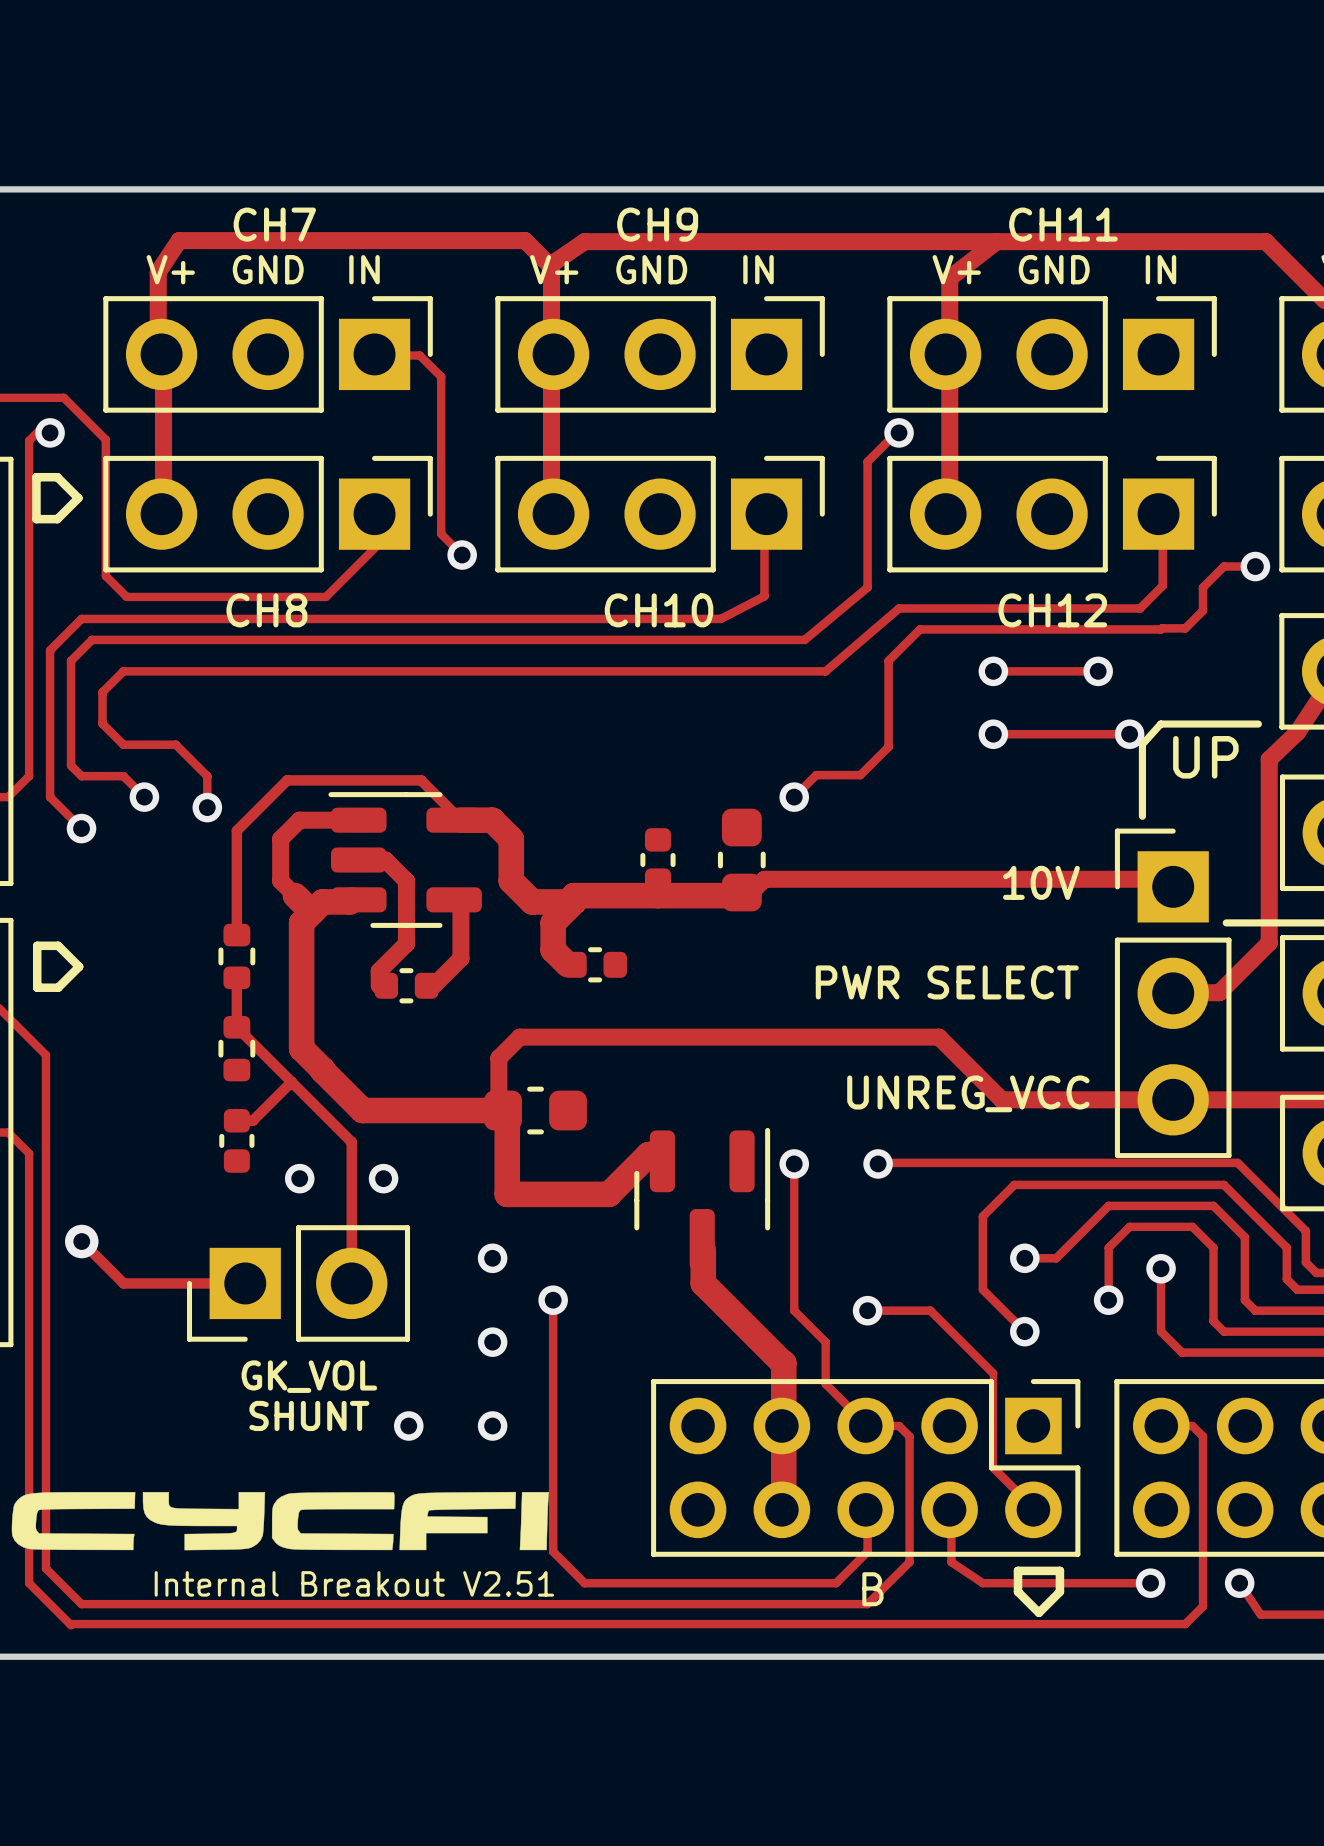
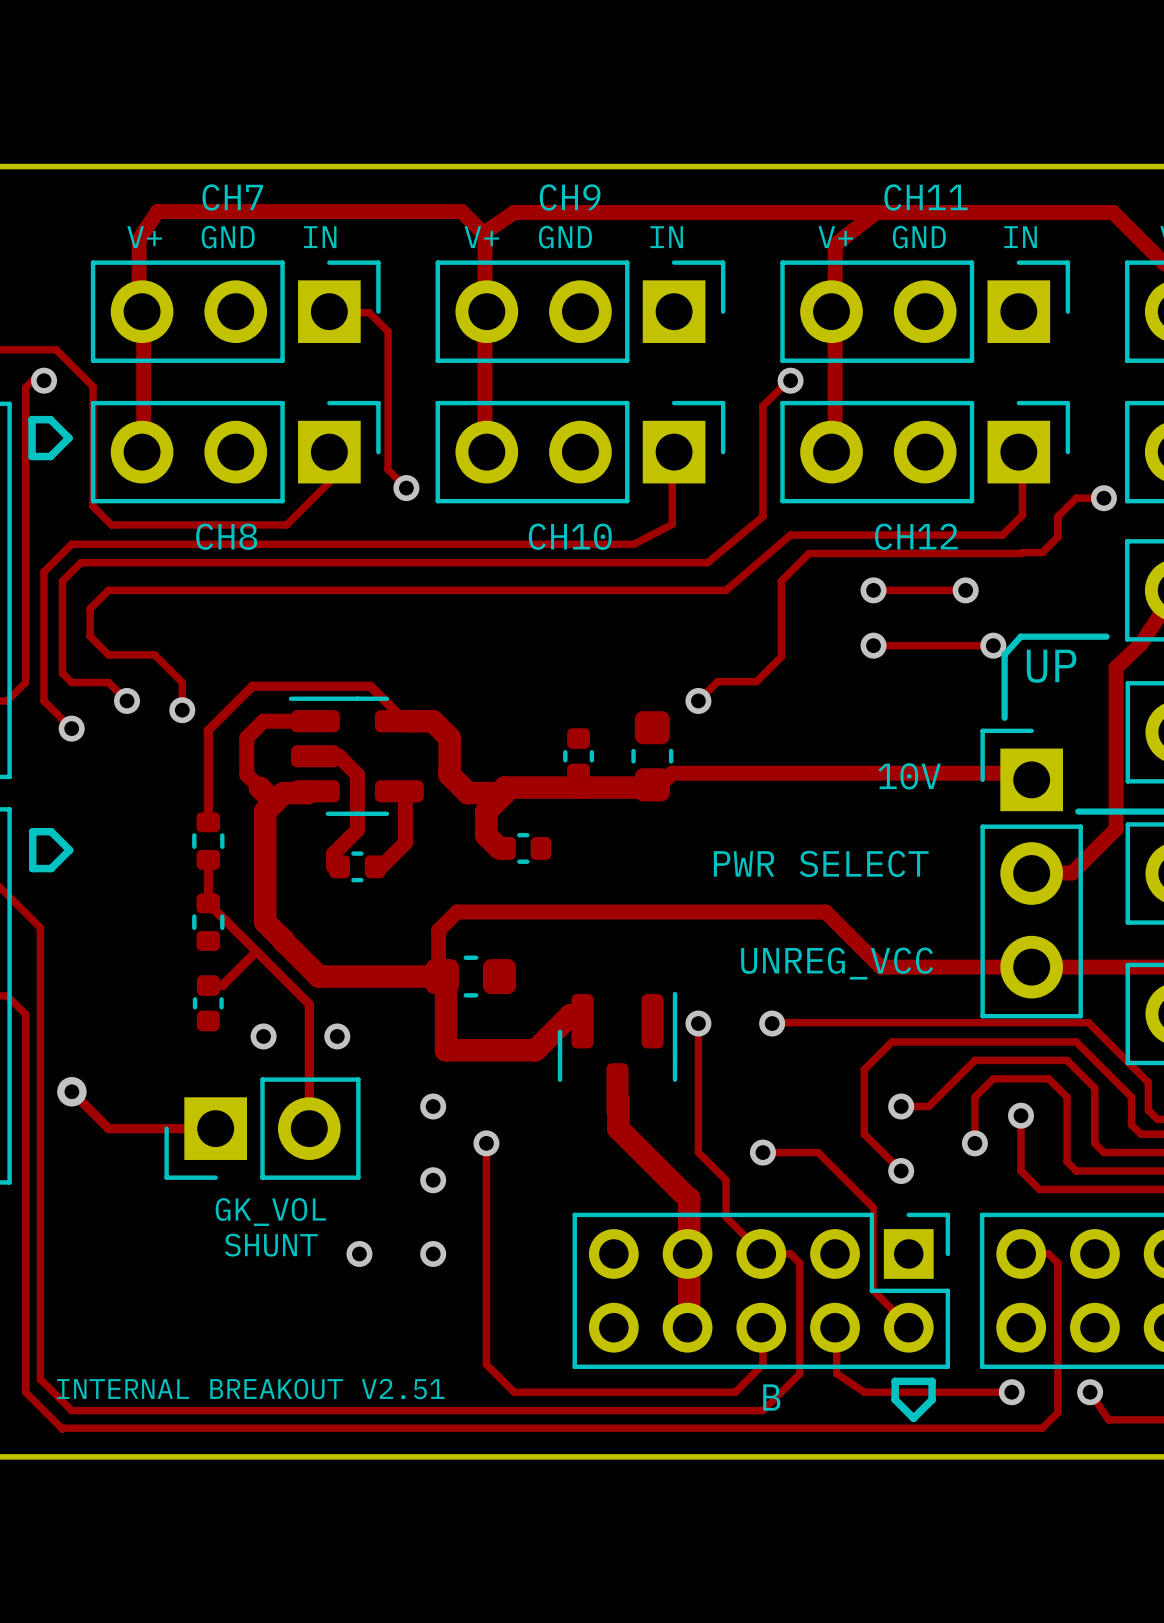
drawing: [11, 1491, 550, 1551] -> none
text: none -> INTERNAL BREAKOUT V2.51 (250, 1389)
text: Internal Breakout V2.51 (354, 1583) -> none

